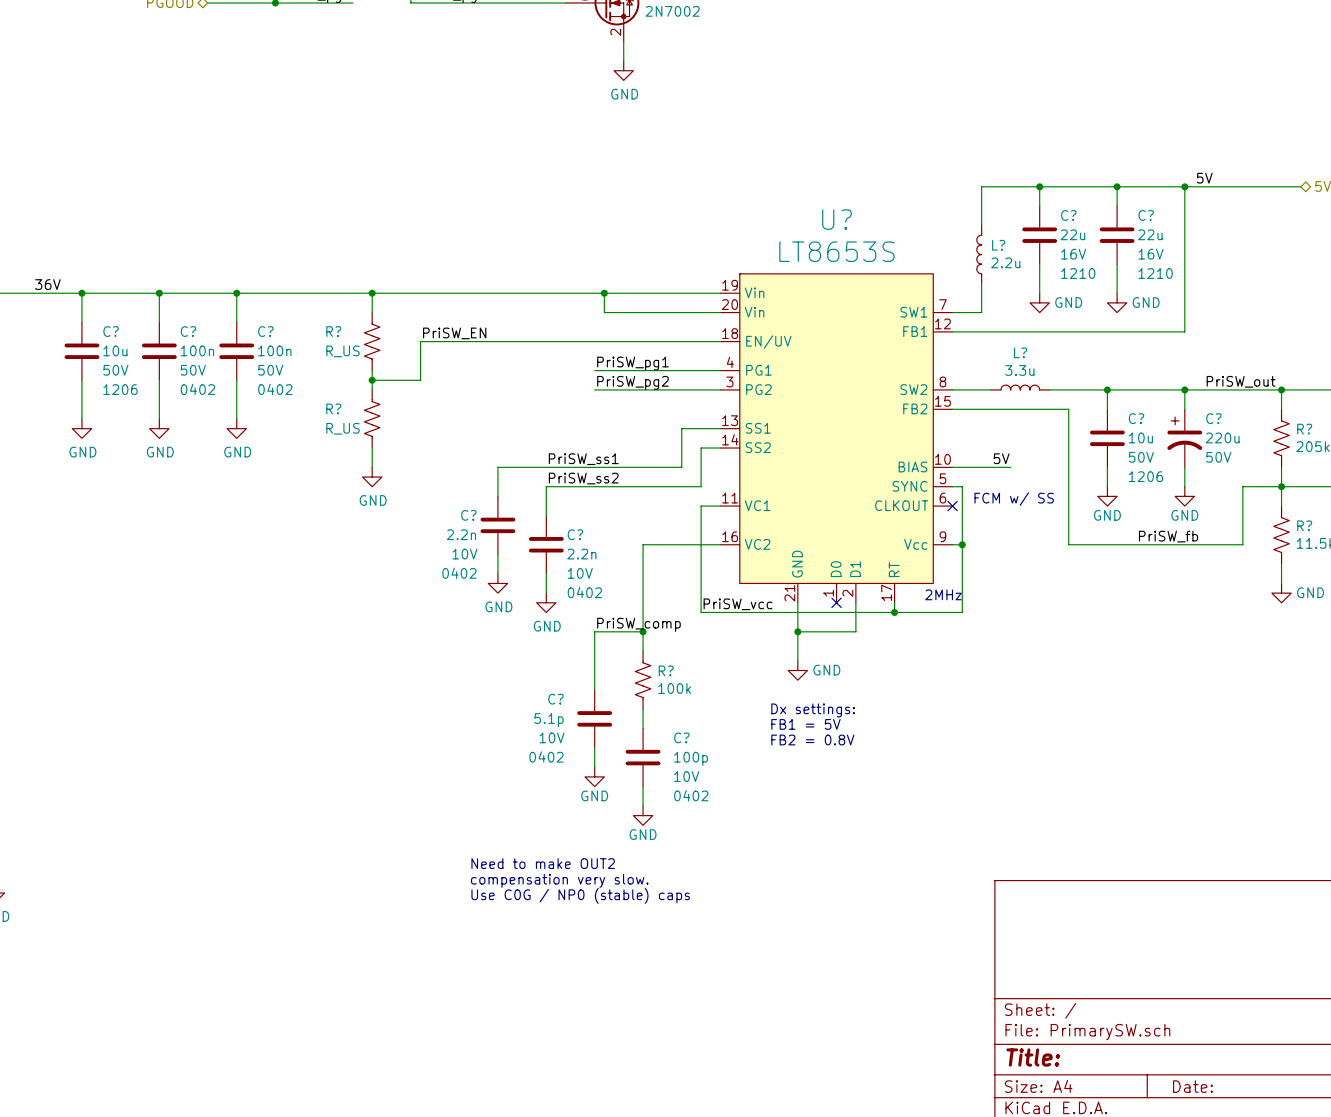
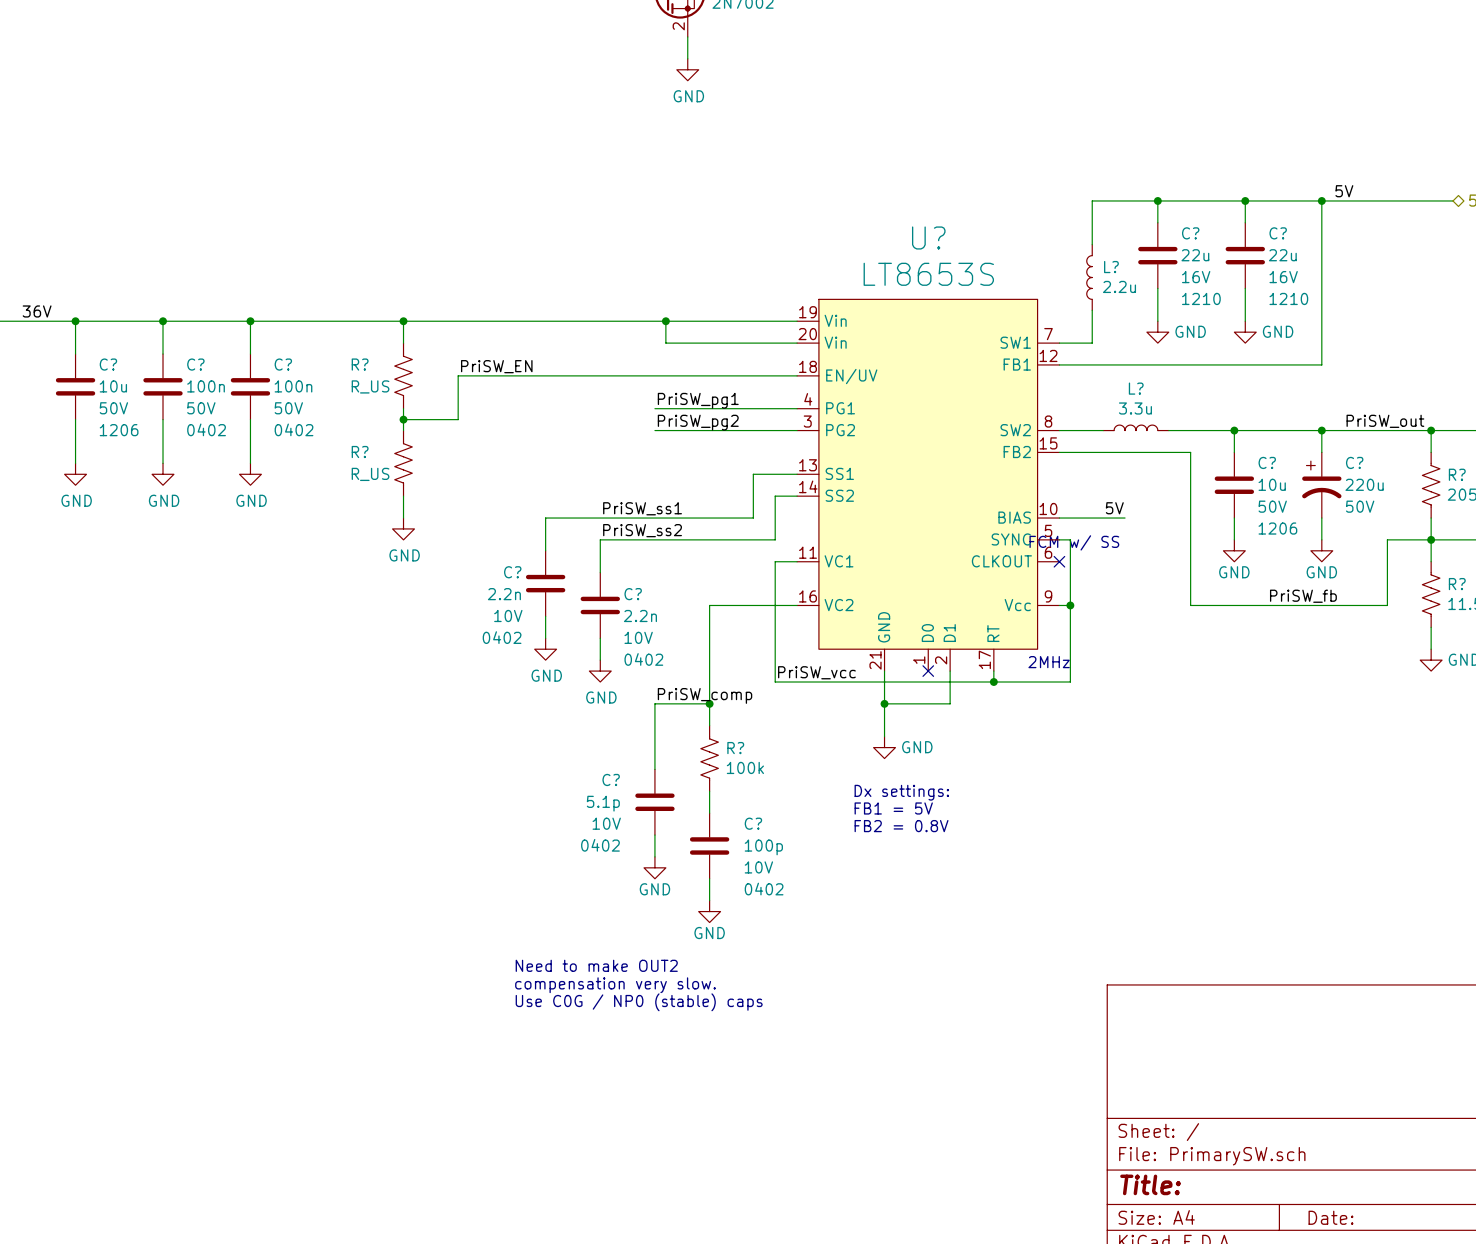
text position: FCM w/ SS (1014, 499) -> FCM w/ SS (1074, 542)

